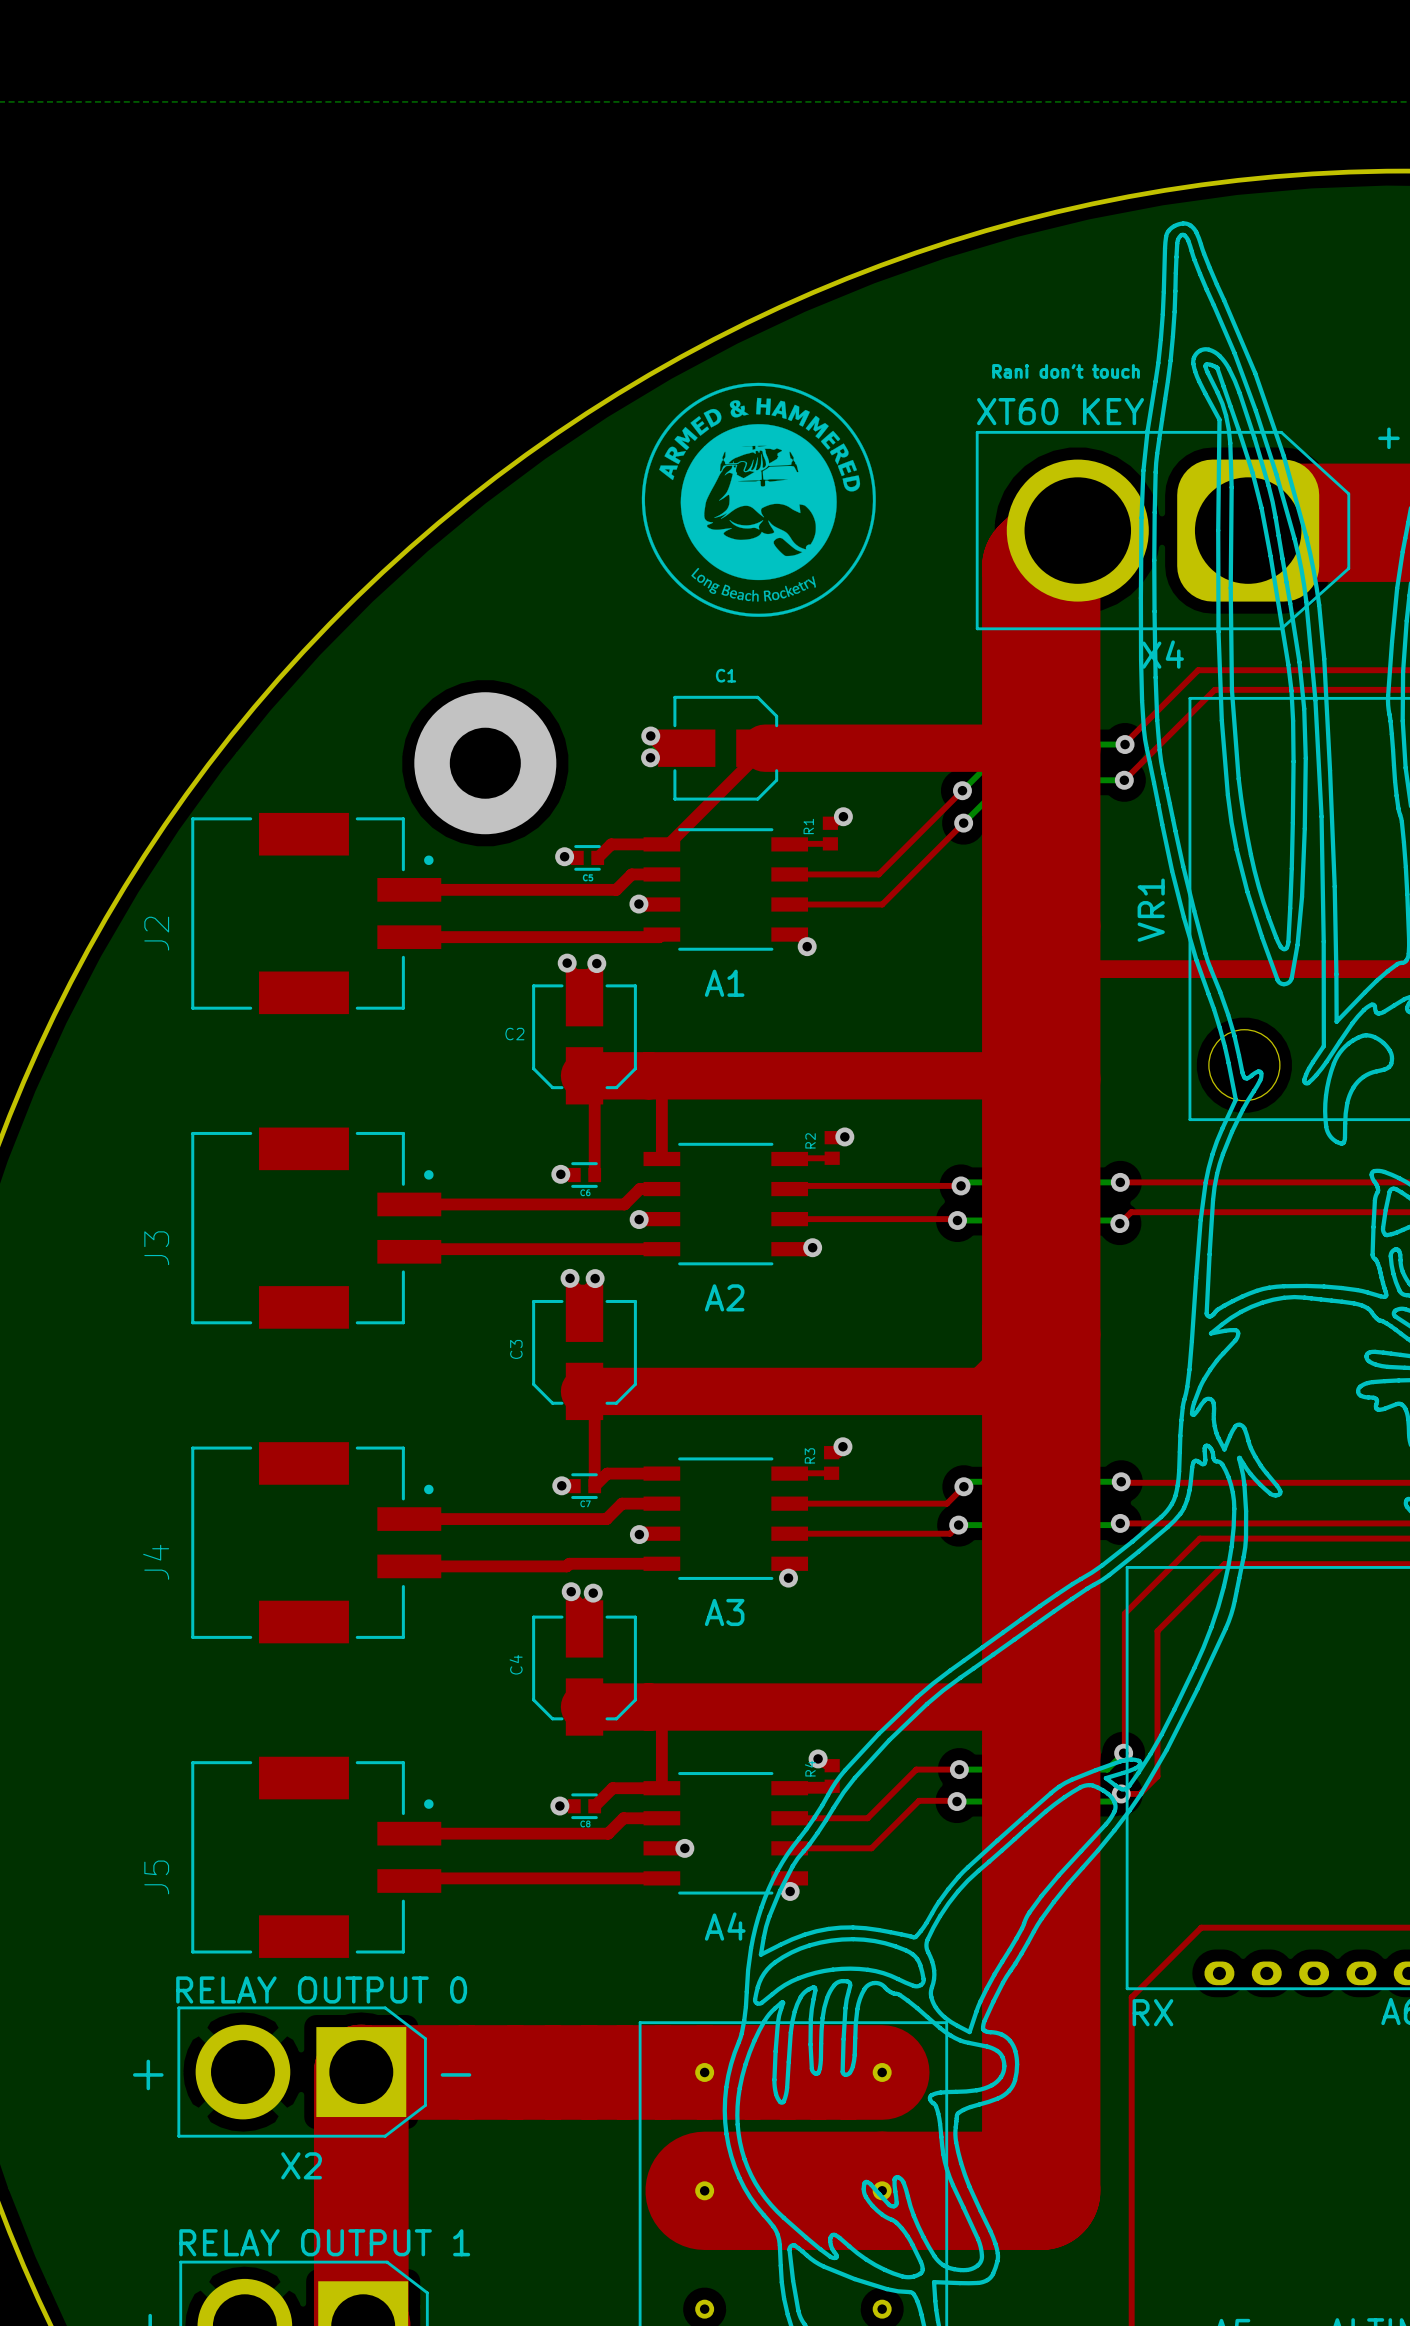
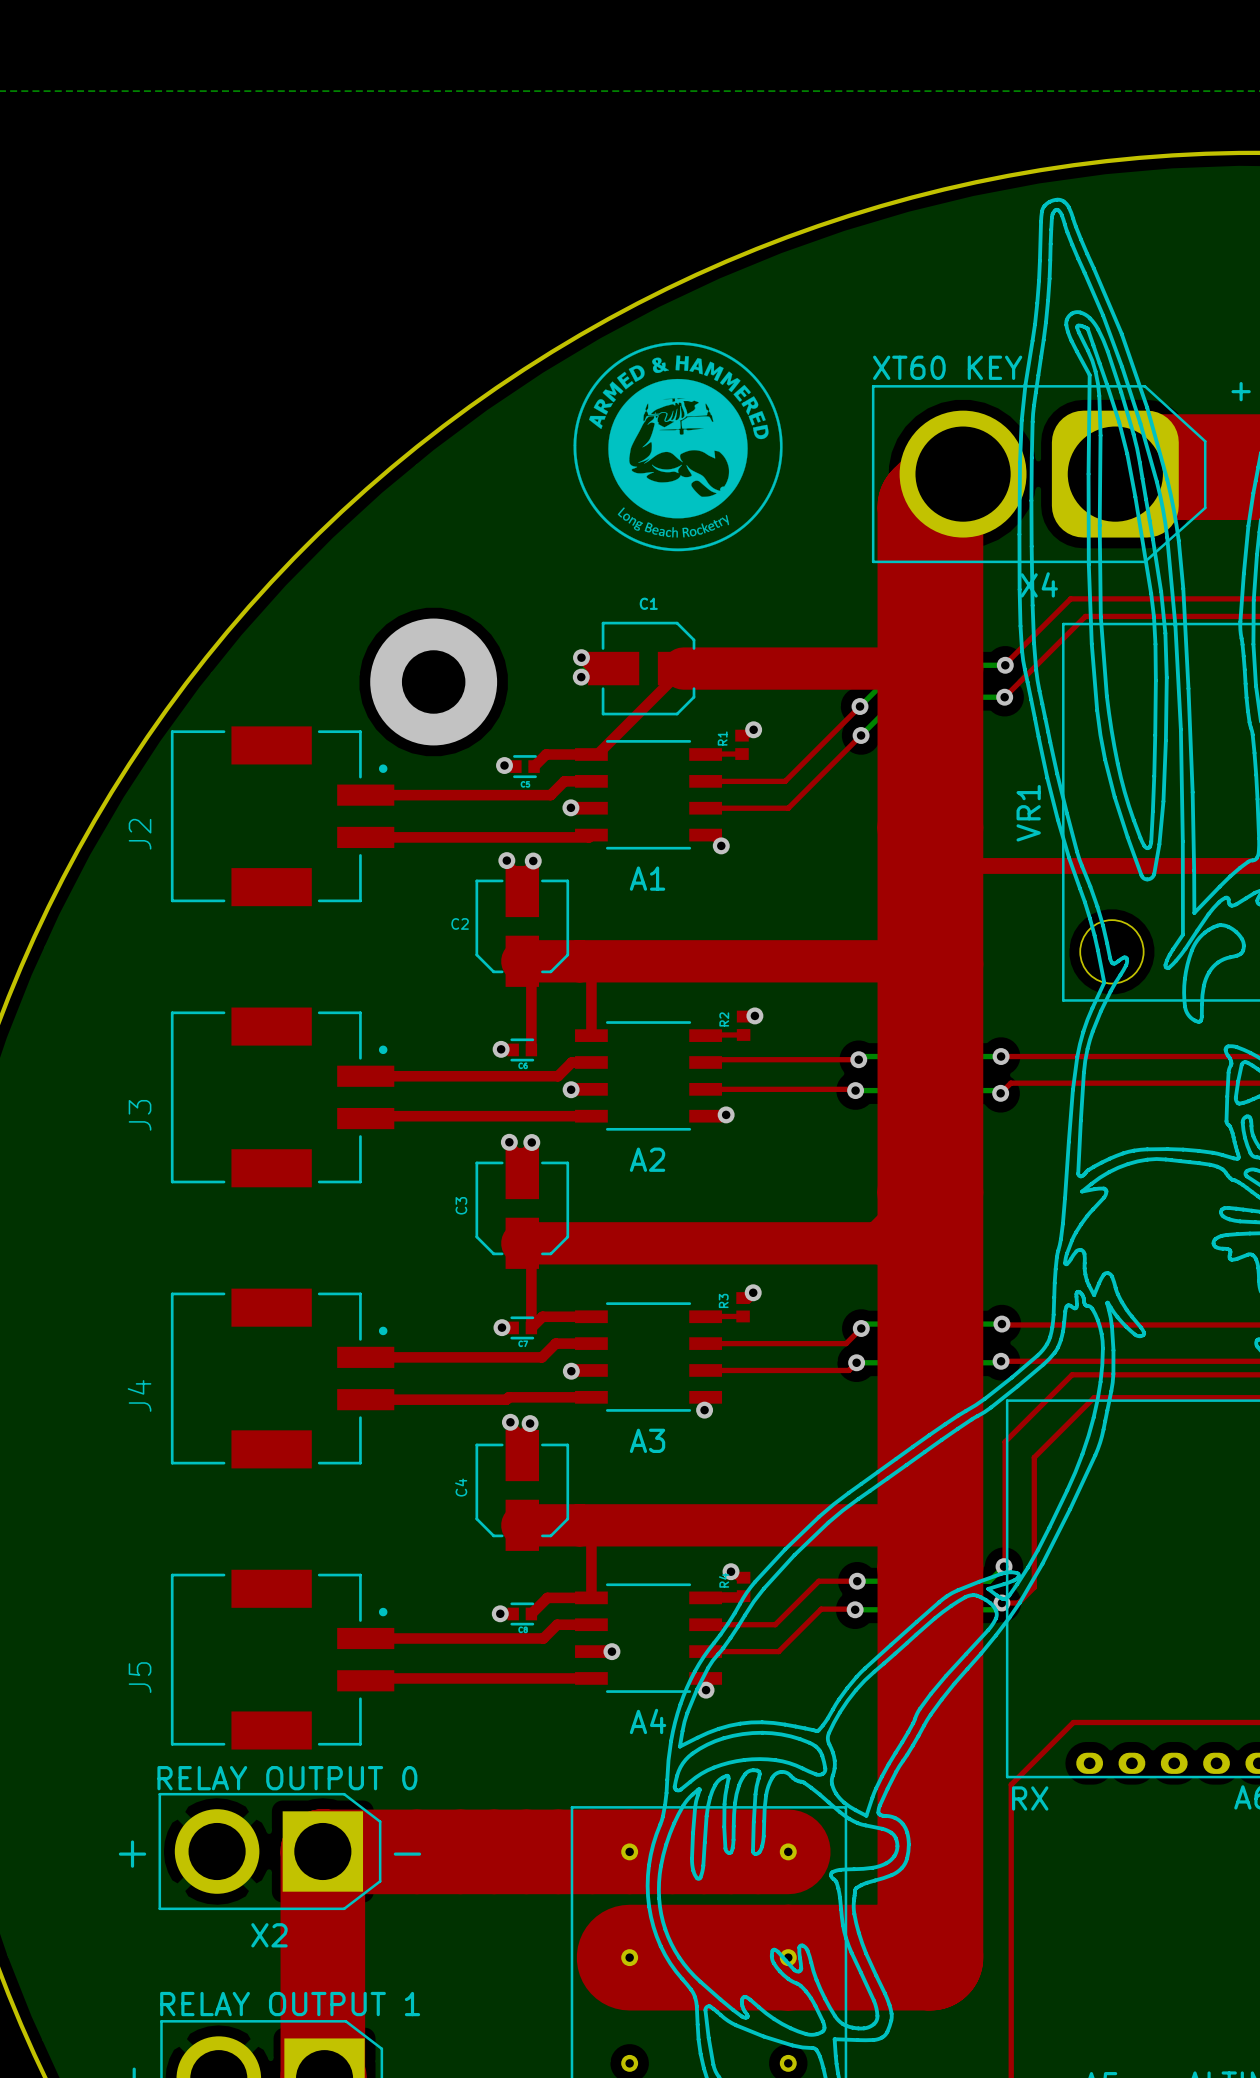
text: Rani don't touch (1066, 371) -> none

